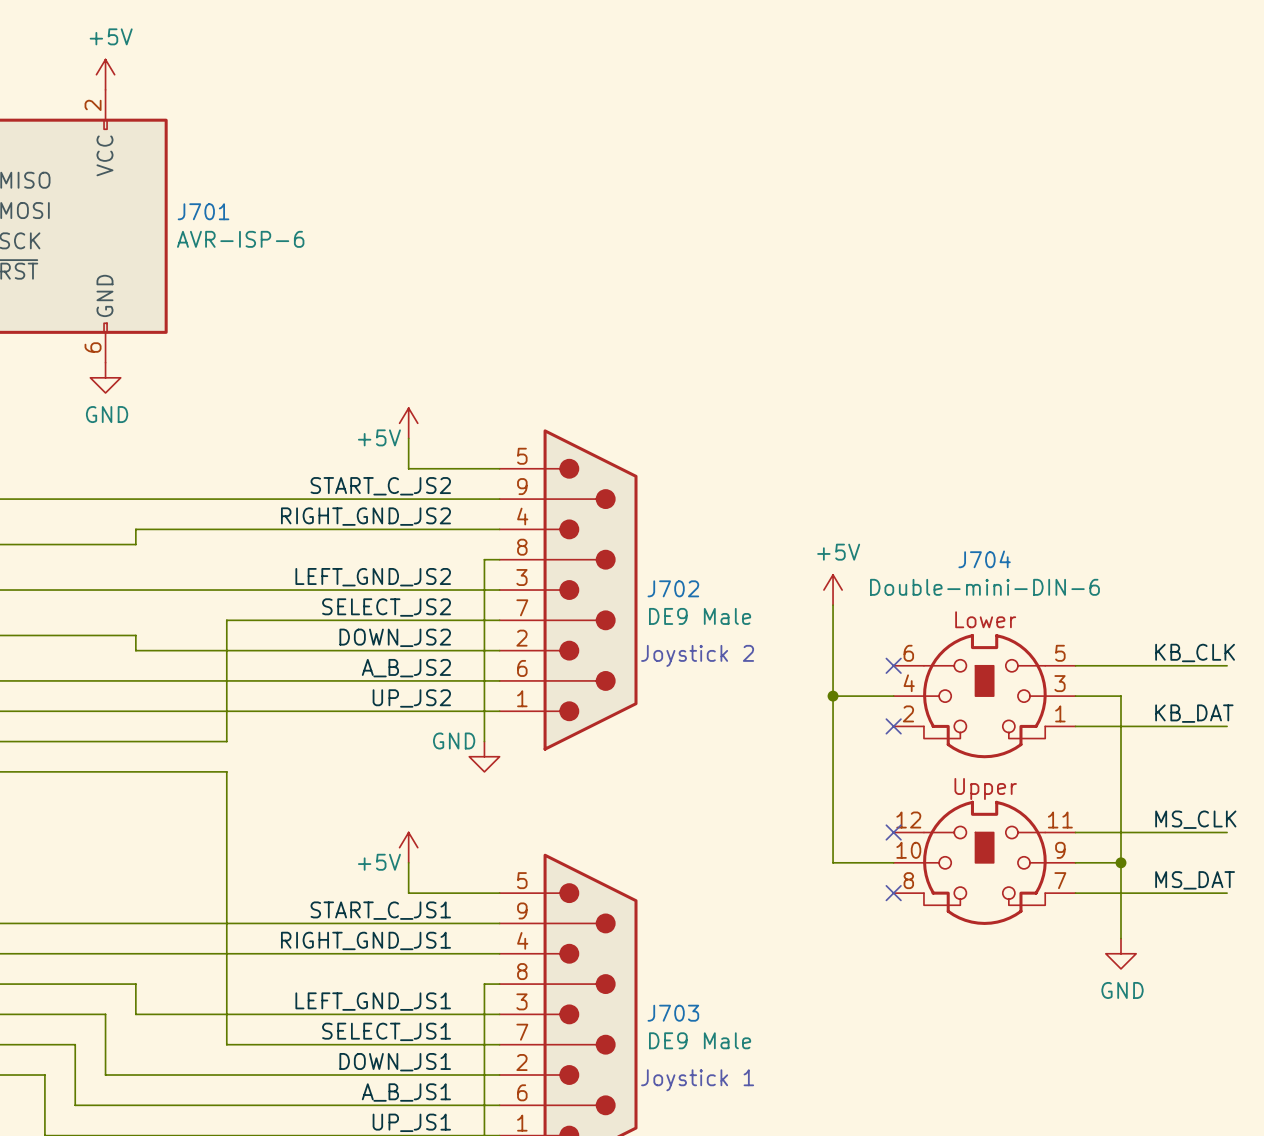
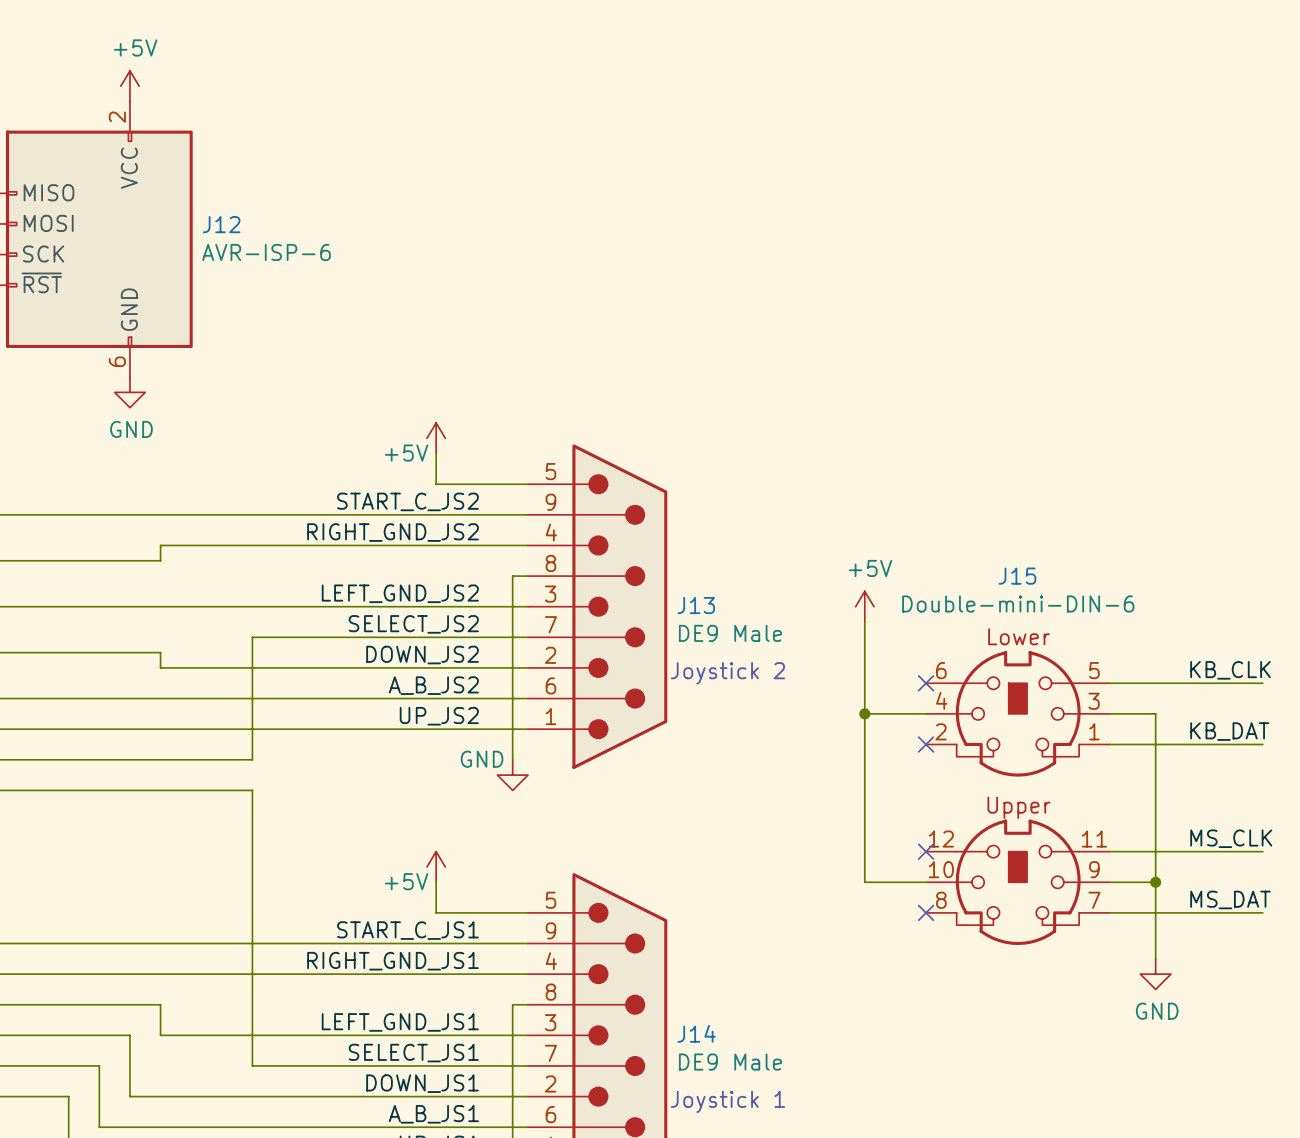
J701 name: J701 (203, 211) -> J12 (221, 224)
J704 name: J704 (984, 559) -> J15 (1017, 576)
J702 name: J702 (673, 588) -> J13 (696, 605)
J703 name: J703 (673, 1013) -> J14 (696, 1033)

